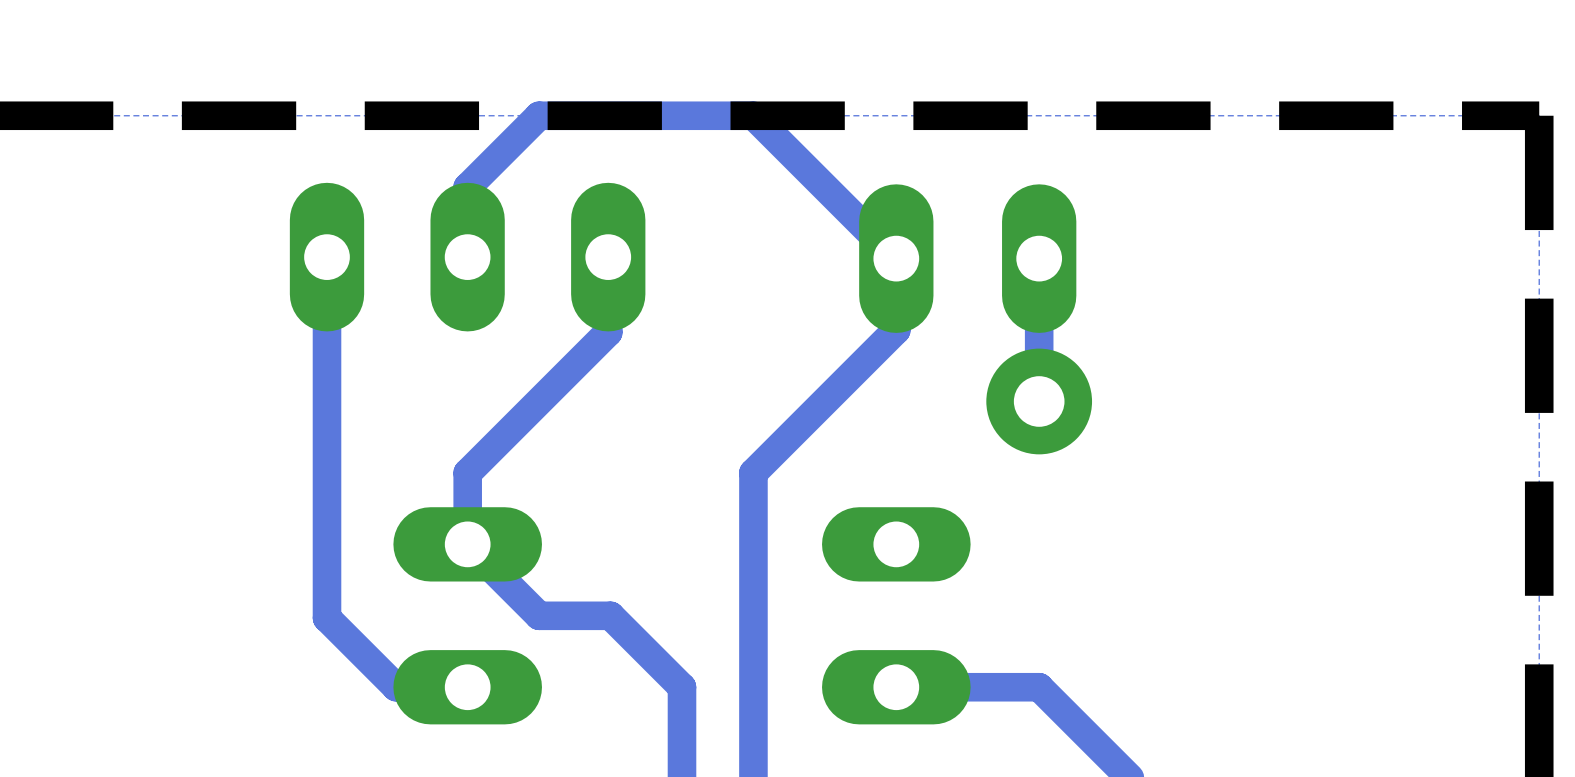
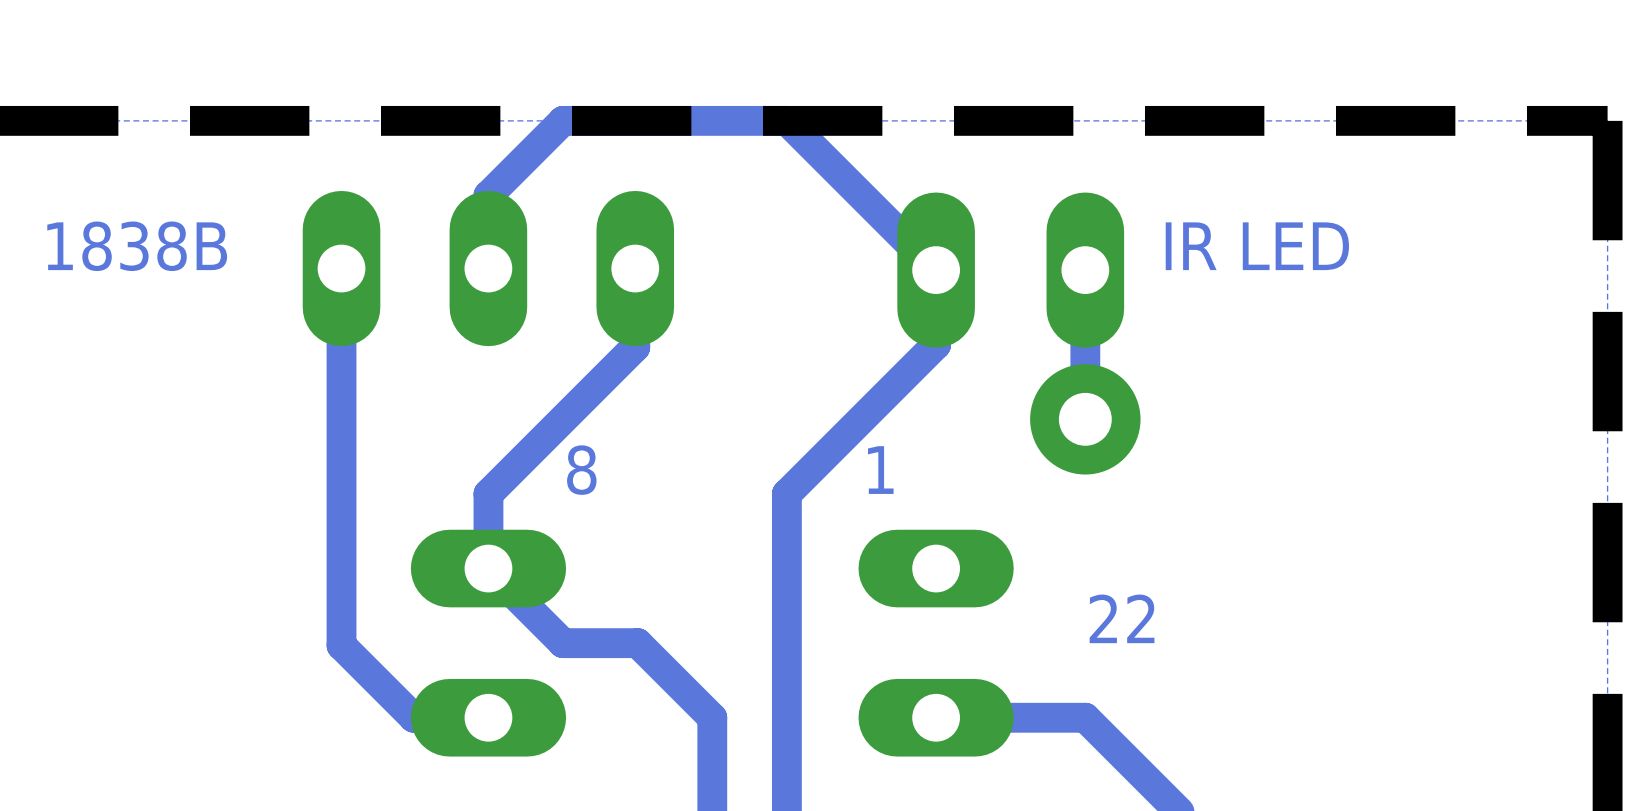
text: none -> 1838B (137, 246)
text: none -> IR LED (1257, 246)
text: none -> 8 (581, 470)
text: none -> 1 (880, 470)
text: none -> 22 (1122, 618)

